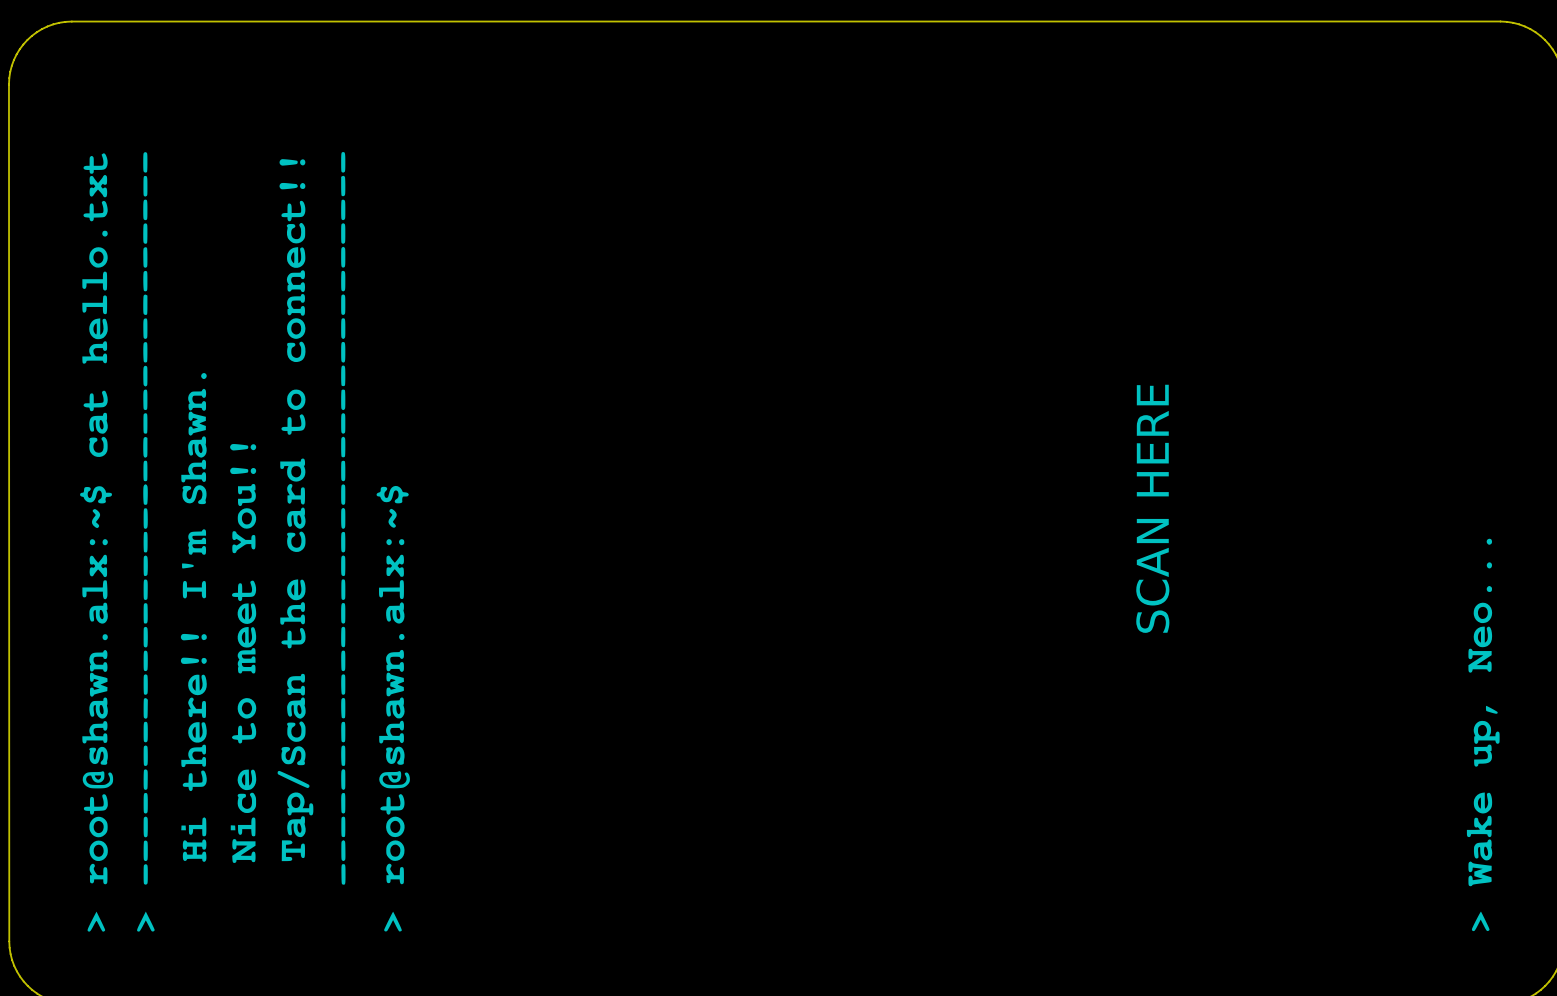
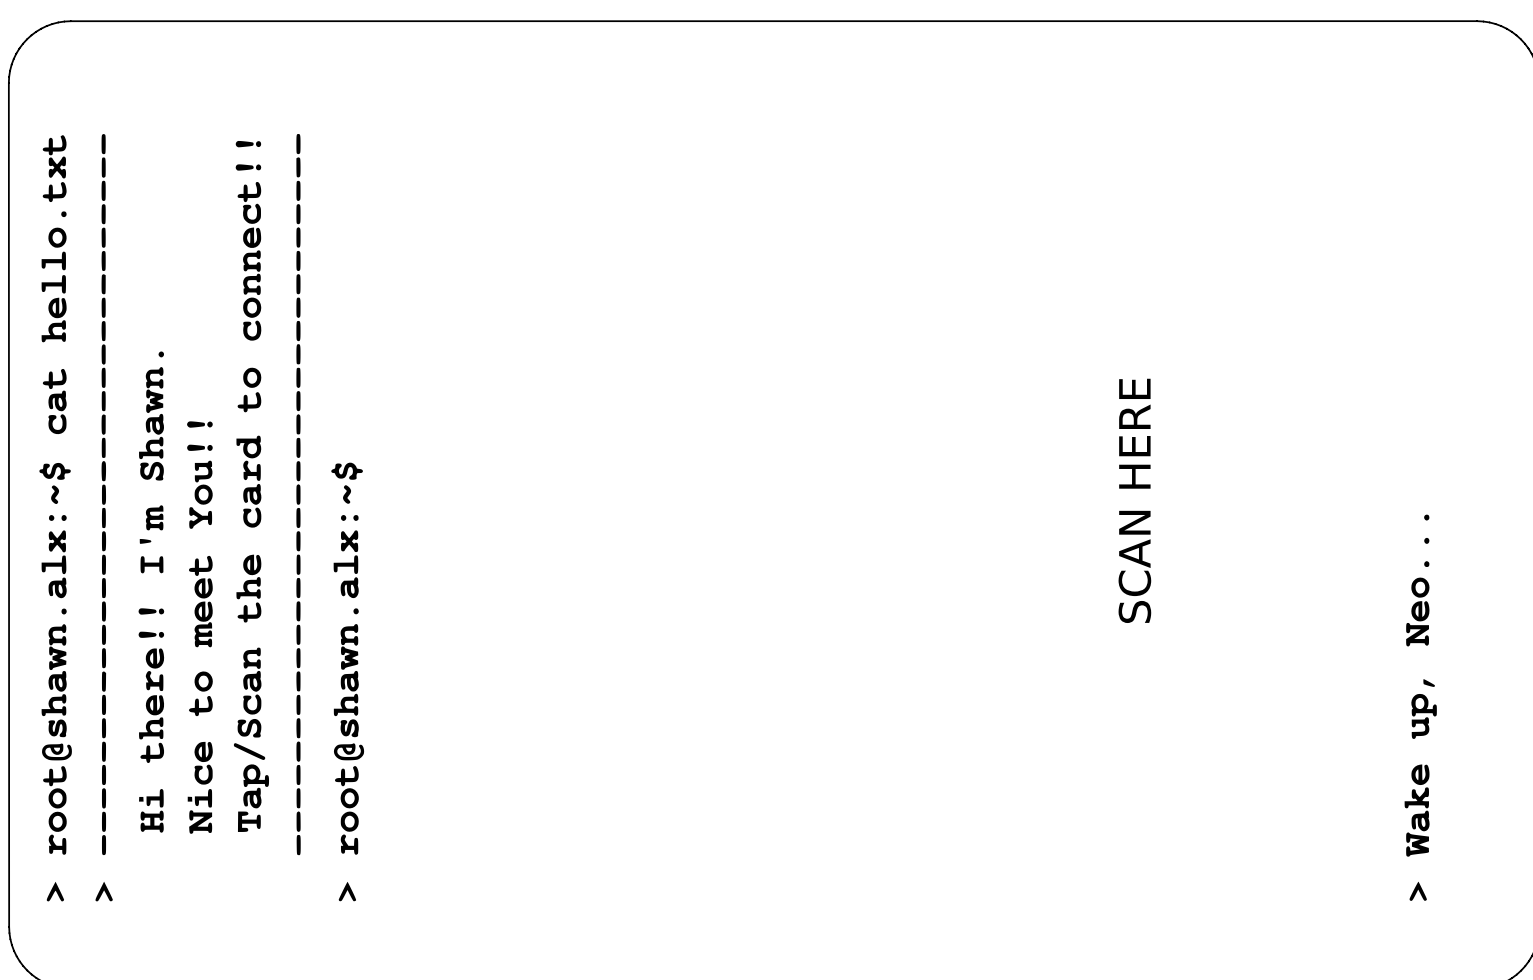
drawing position: (789, 541) -> (738, 517)

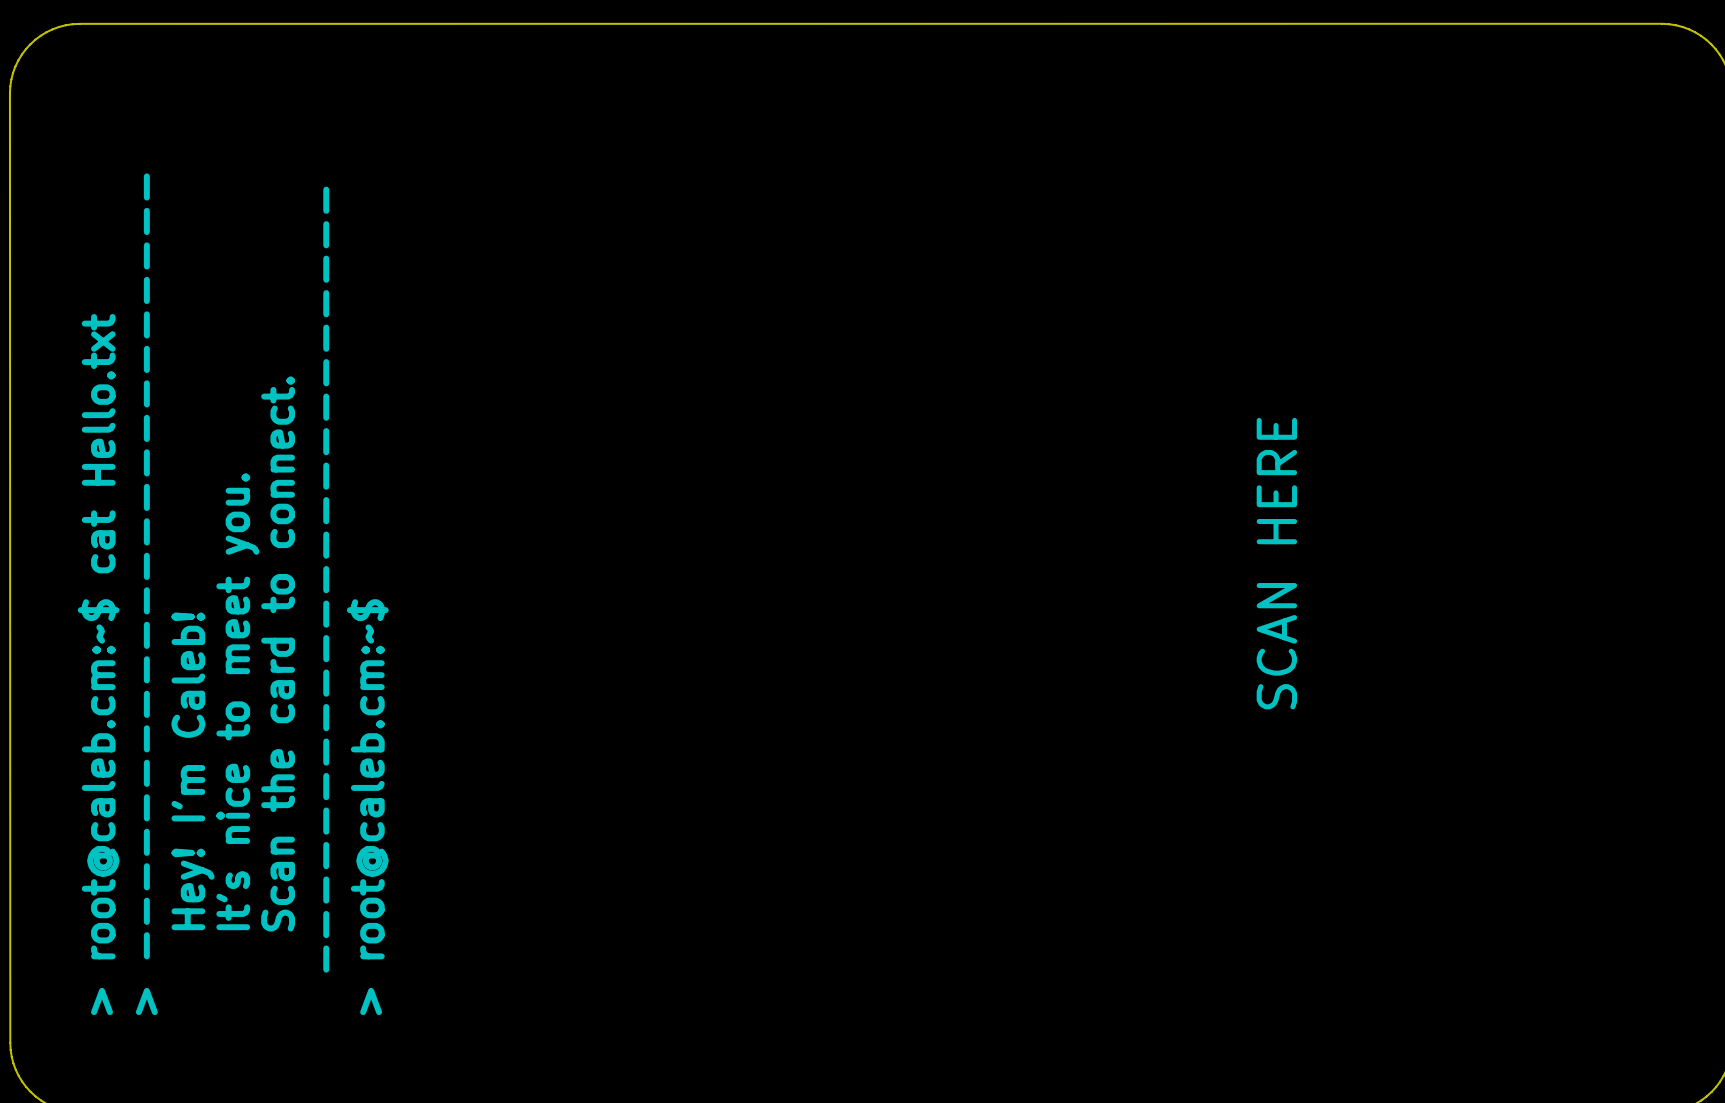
drawing: [39, 133, 1437, 902] -> none
text: none -> > root@caleb.cm:~$ cat Hello.txt (98, 664)
text: none -> Scan the card to connect. (278, 653)
text: none -> It's nice to meet you. (237, 701)
text: none -> > root@caleb.cm:~$ (367, 807)
text: none -> Hey! I'm Caleb! (193, 771)
text: none -> ----------------------- (326, 579)
text: none -> > ----------------------- (146, 594)

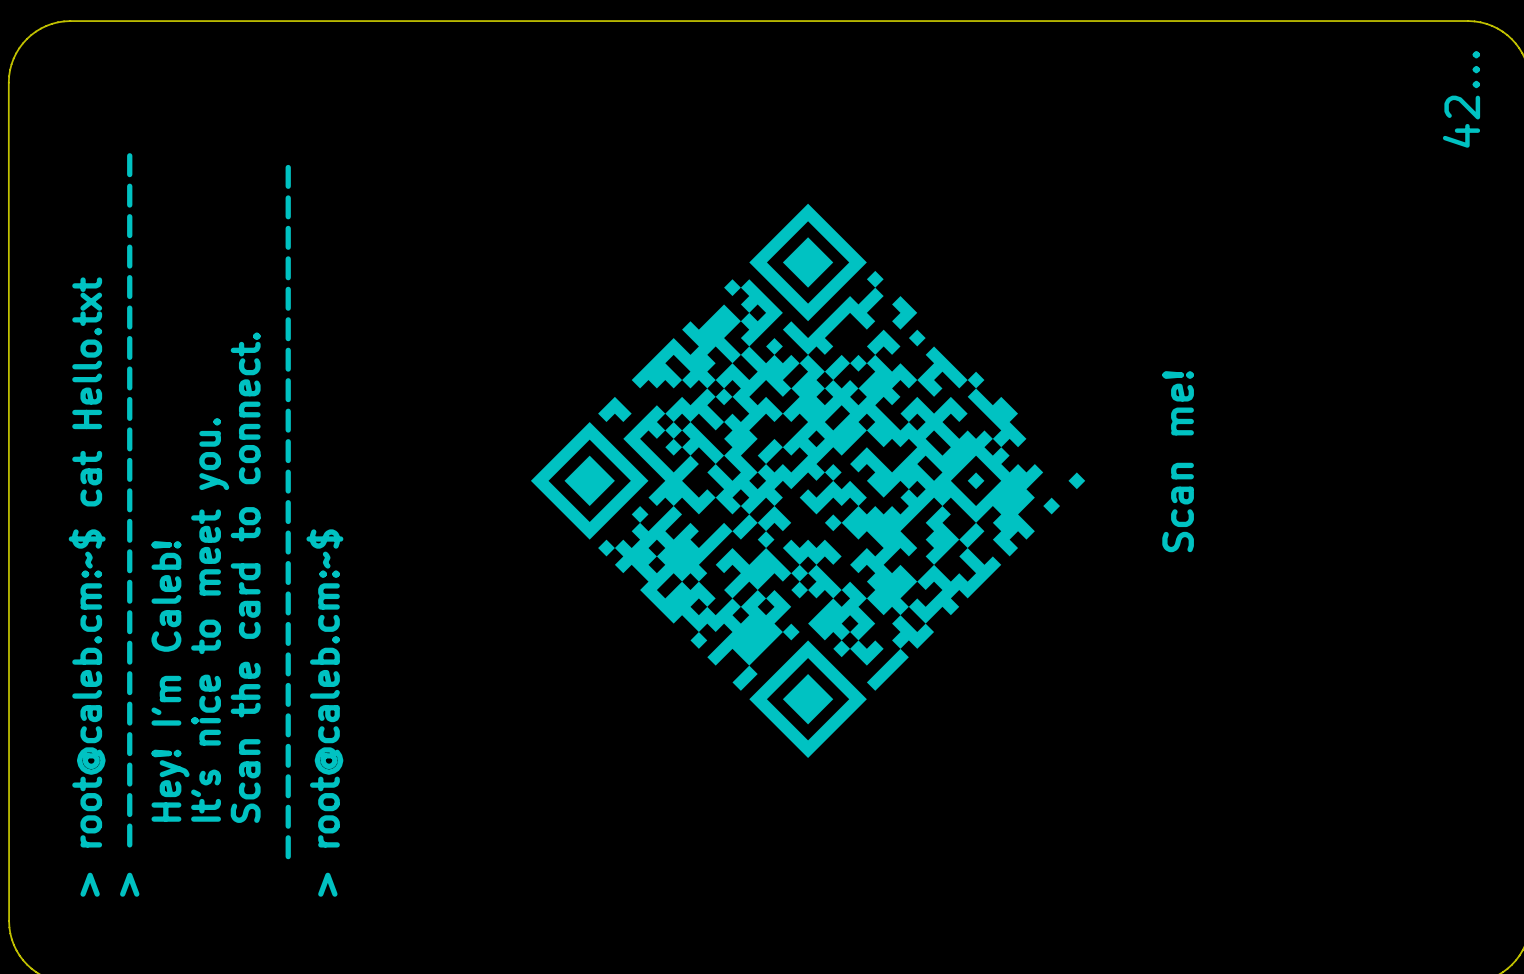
text: none -> 42... (1461, 99)
drawing: none -> [530, 203, 1086, 759]
text: none -> Scan me! (1178, 461)
text: SCAN HERE (1276, 563) -> none

